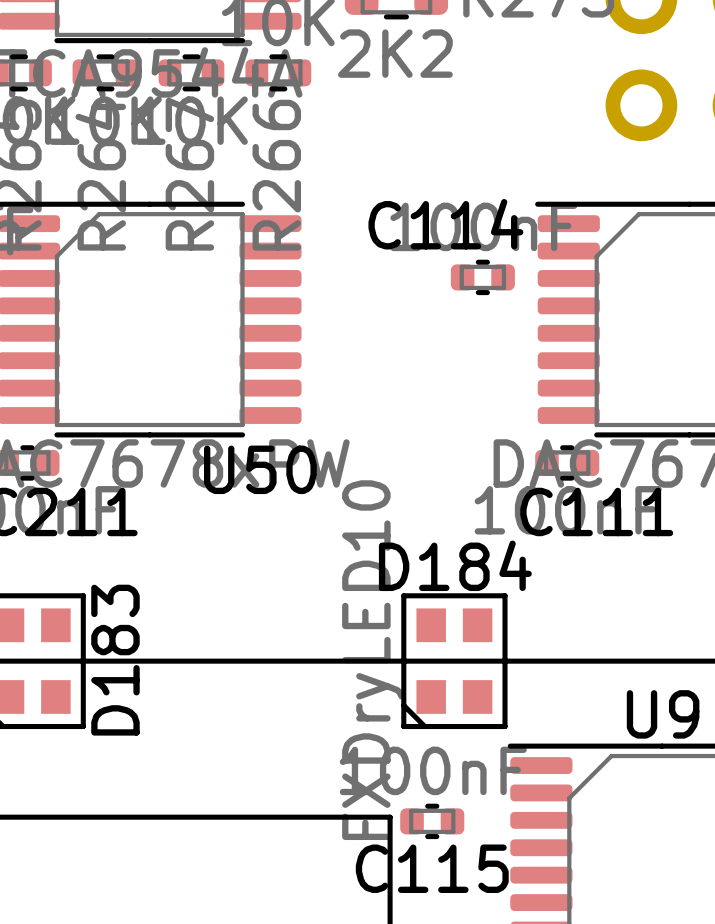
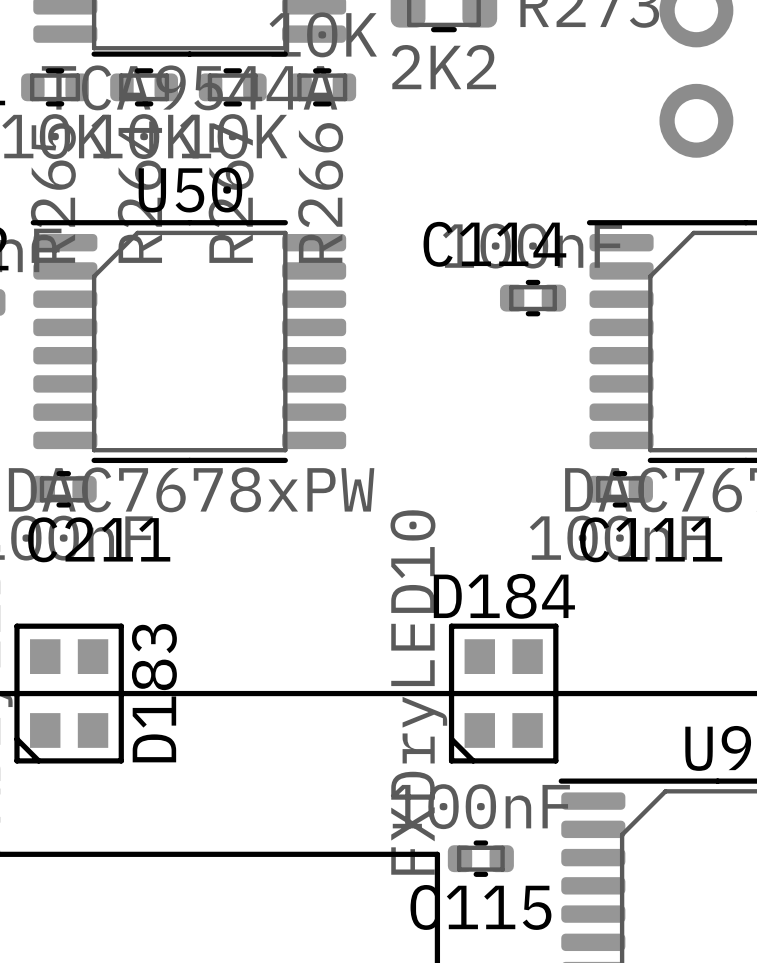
U50 name position: U50 (260, 469) -> U50 (190, 190)

